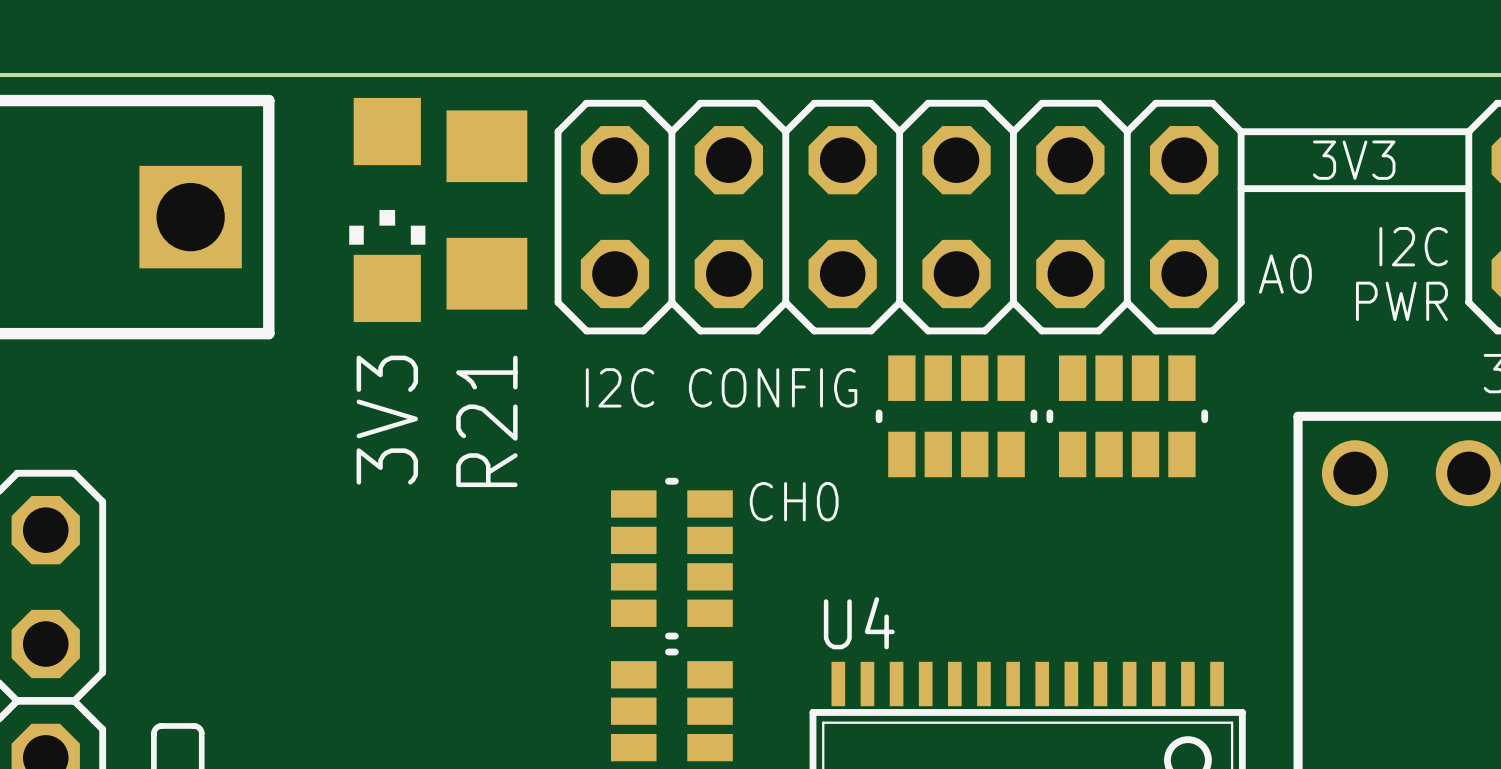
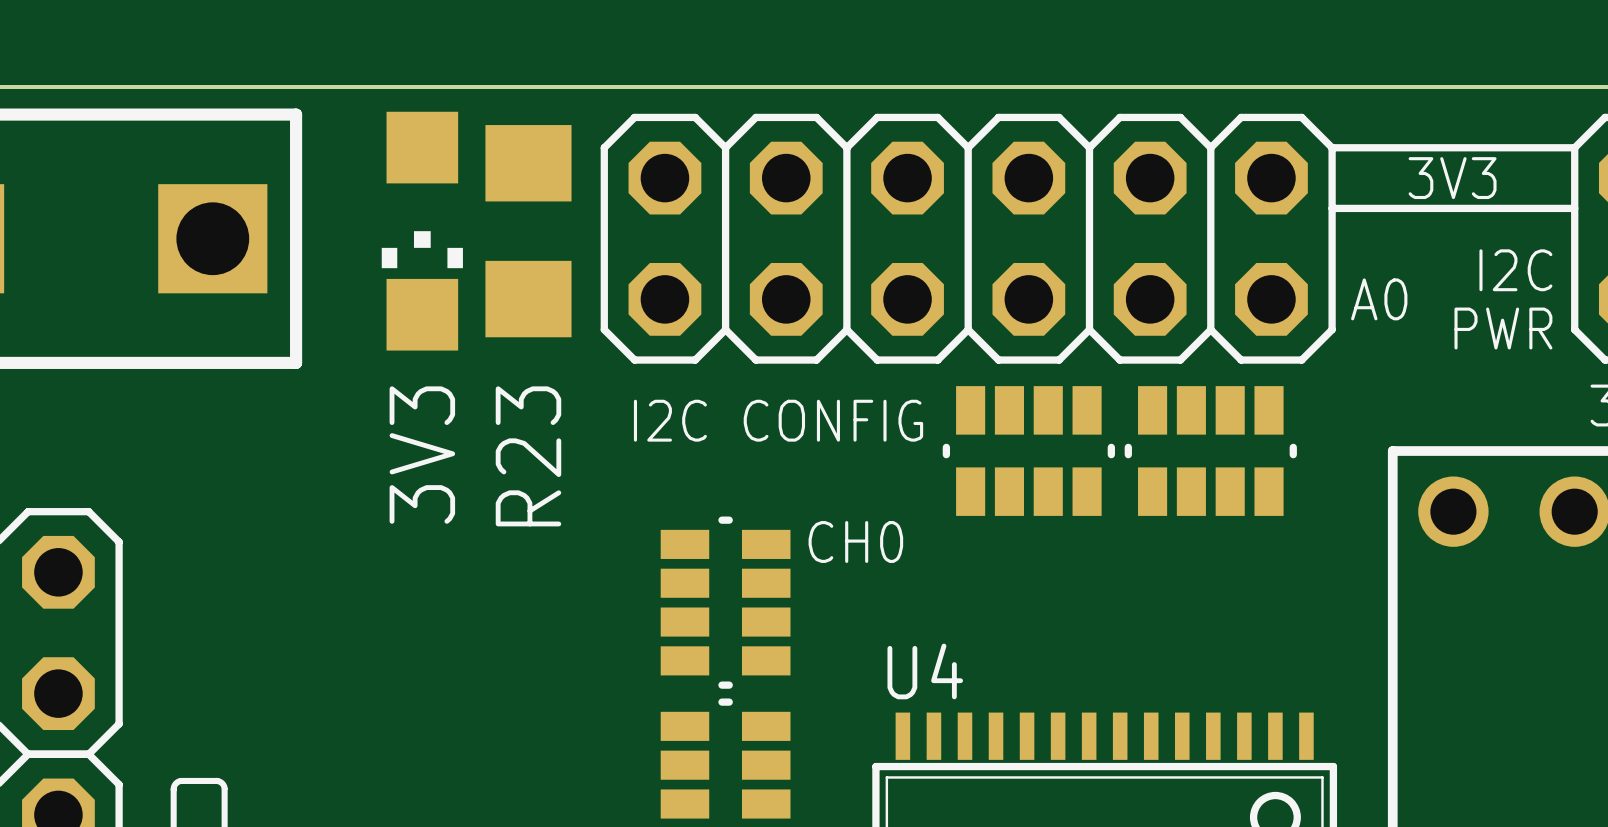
R21 name: R21 (486, 421) -> R23 (528, 456)

